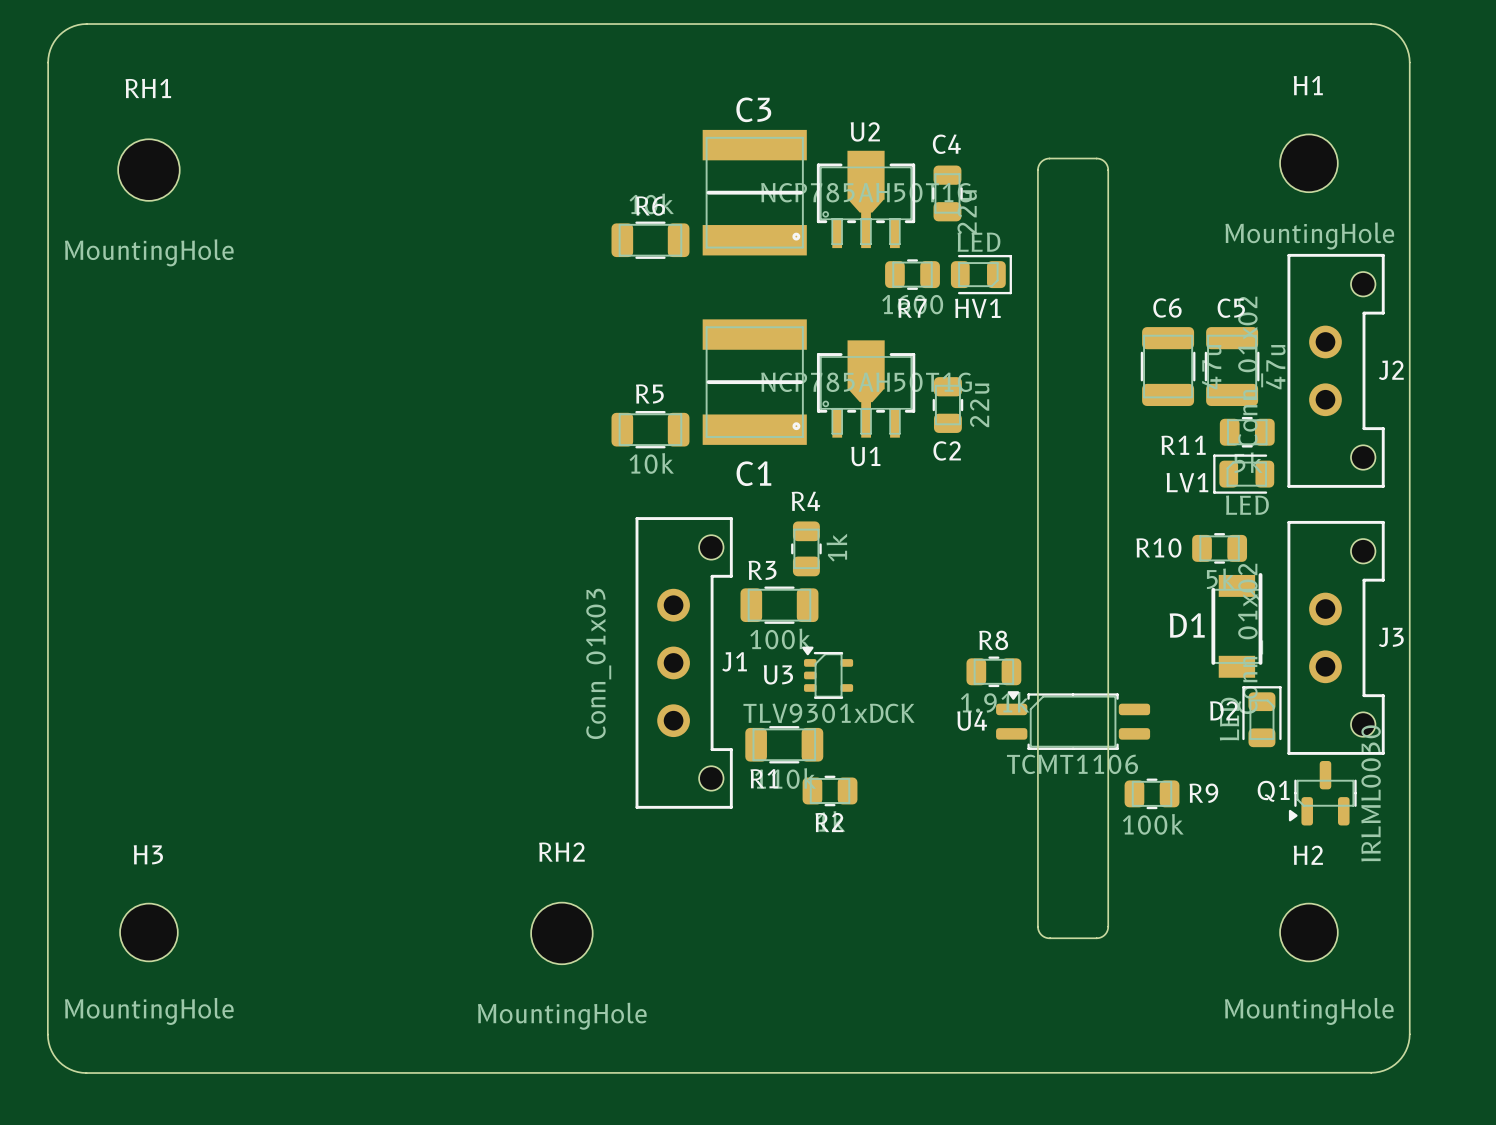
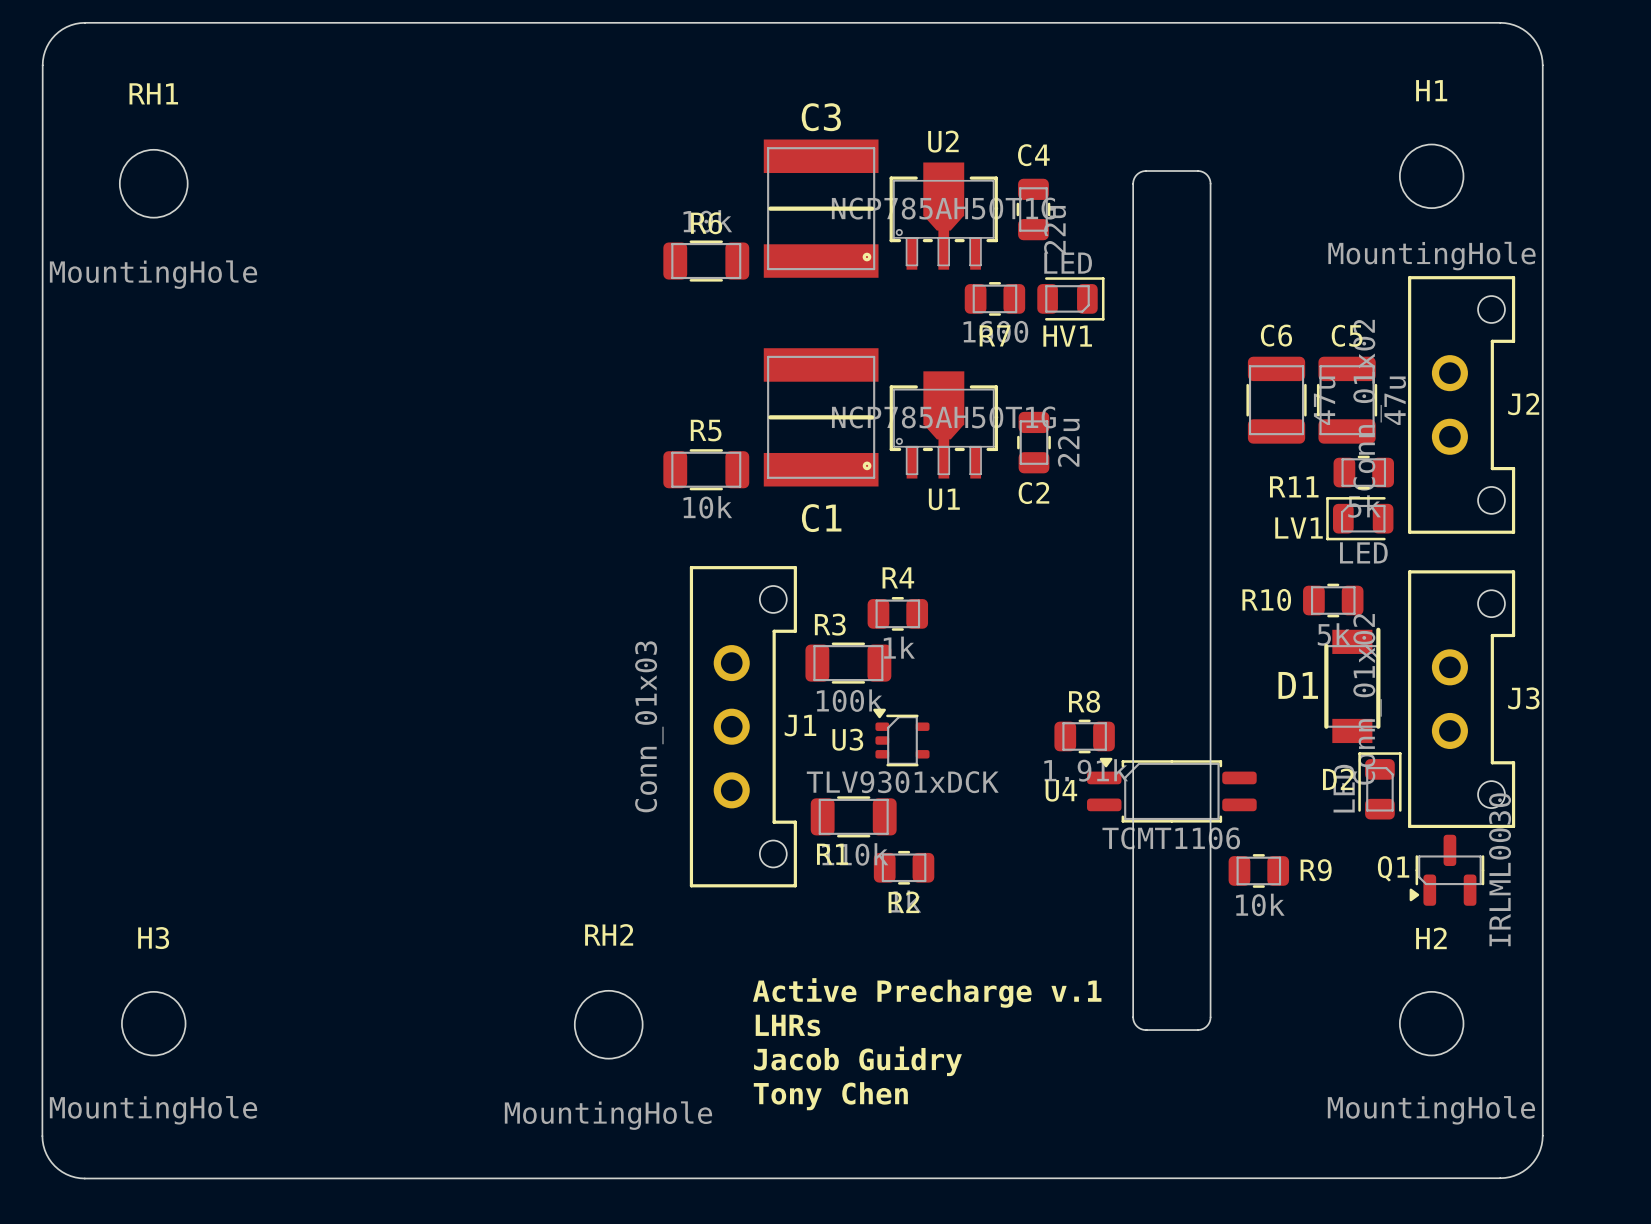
R4 rotation: 0° (806, 548) -> 90° clockwise (897, 613)
R9 value: 100k (1153, 824) -> 10k (1260, 904)
text: none -> Active Precharge v.1 (927, 992)
text: none -> LHRs (787, 1025)
text: none -> Jacob Guidry (857, 1061)
text: none -> Tony Chen (830, 1096)

